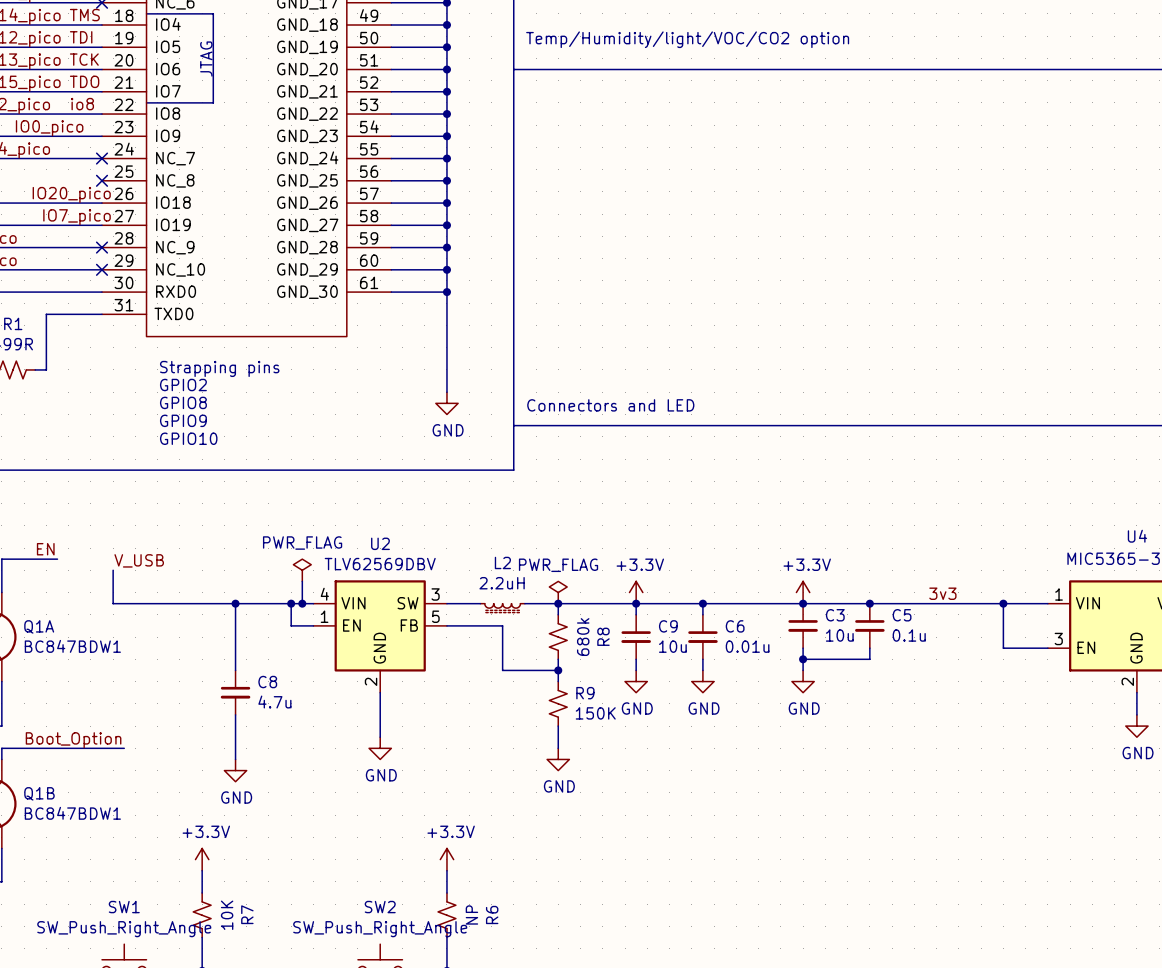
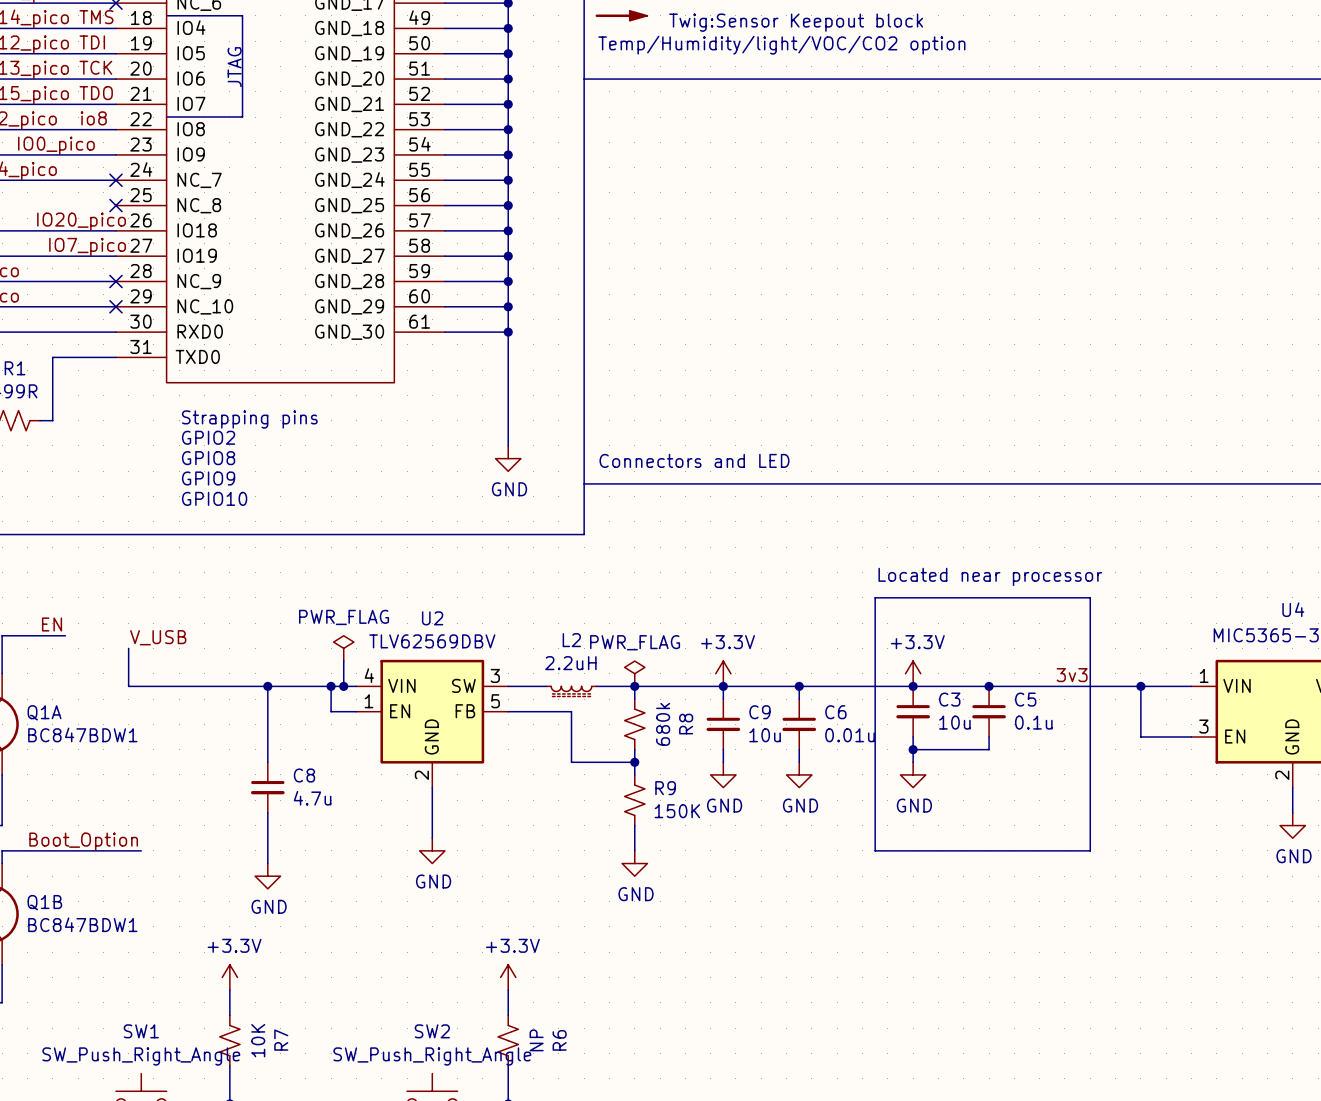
part: none -> (621, 15)
text: none -> Located near processor (990, 576)
line: none -> (875, 597) (1090, 597) (1090, 850) (875, 850) (875, 597)

